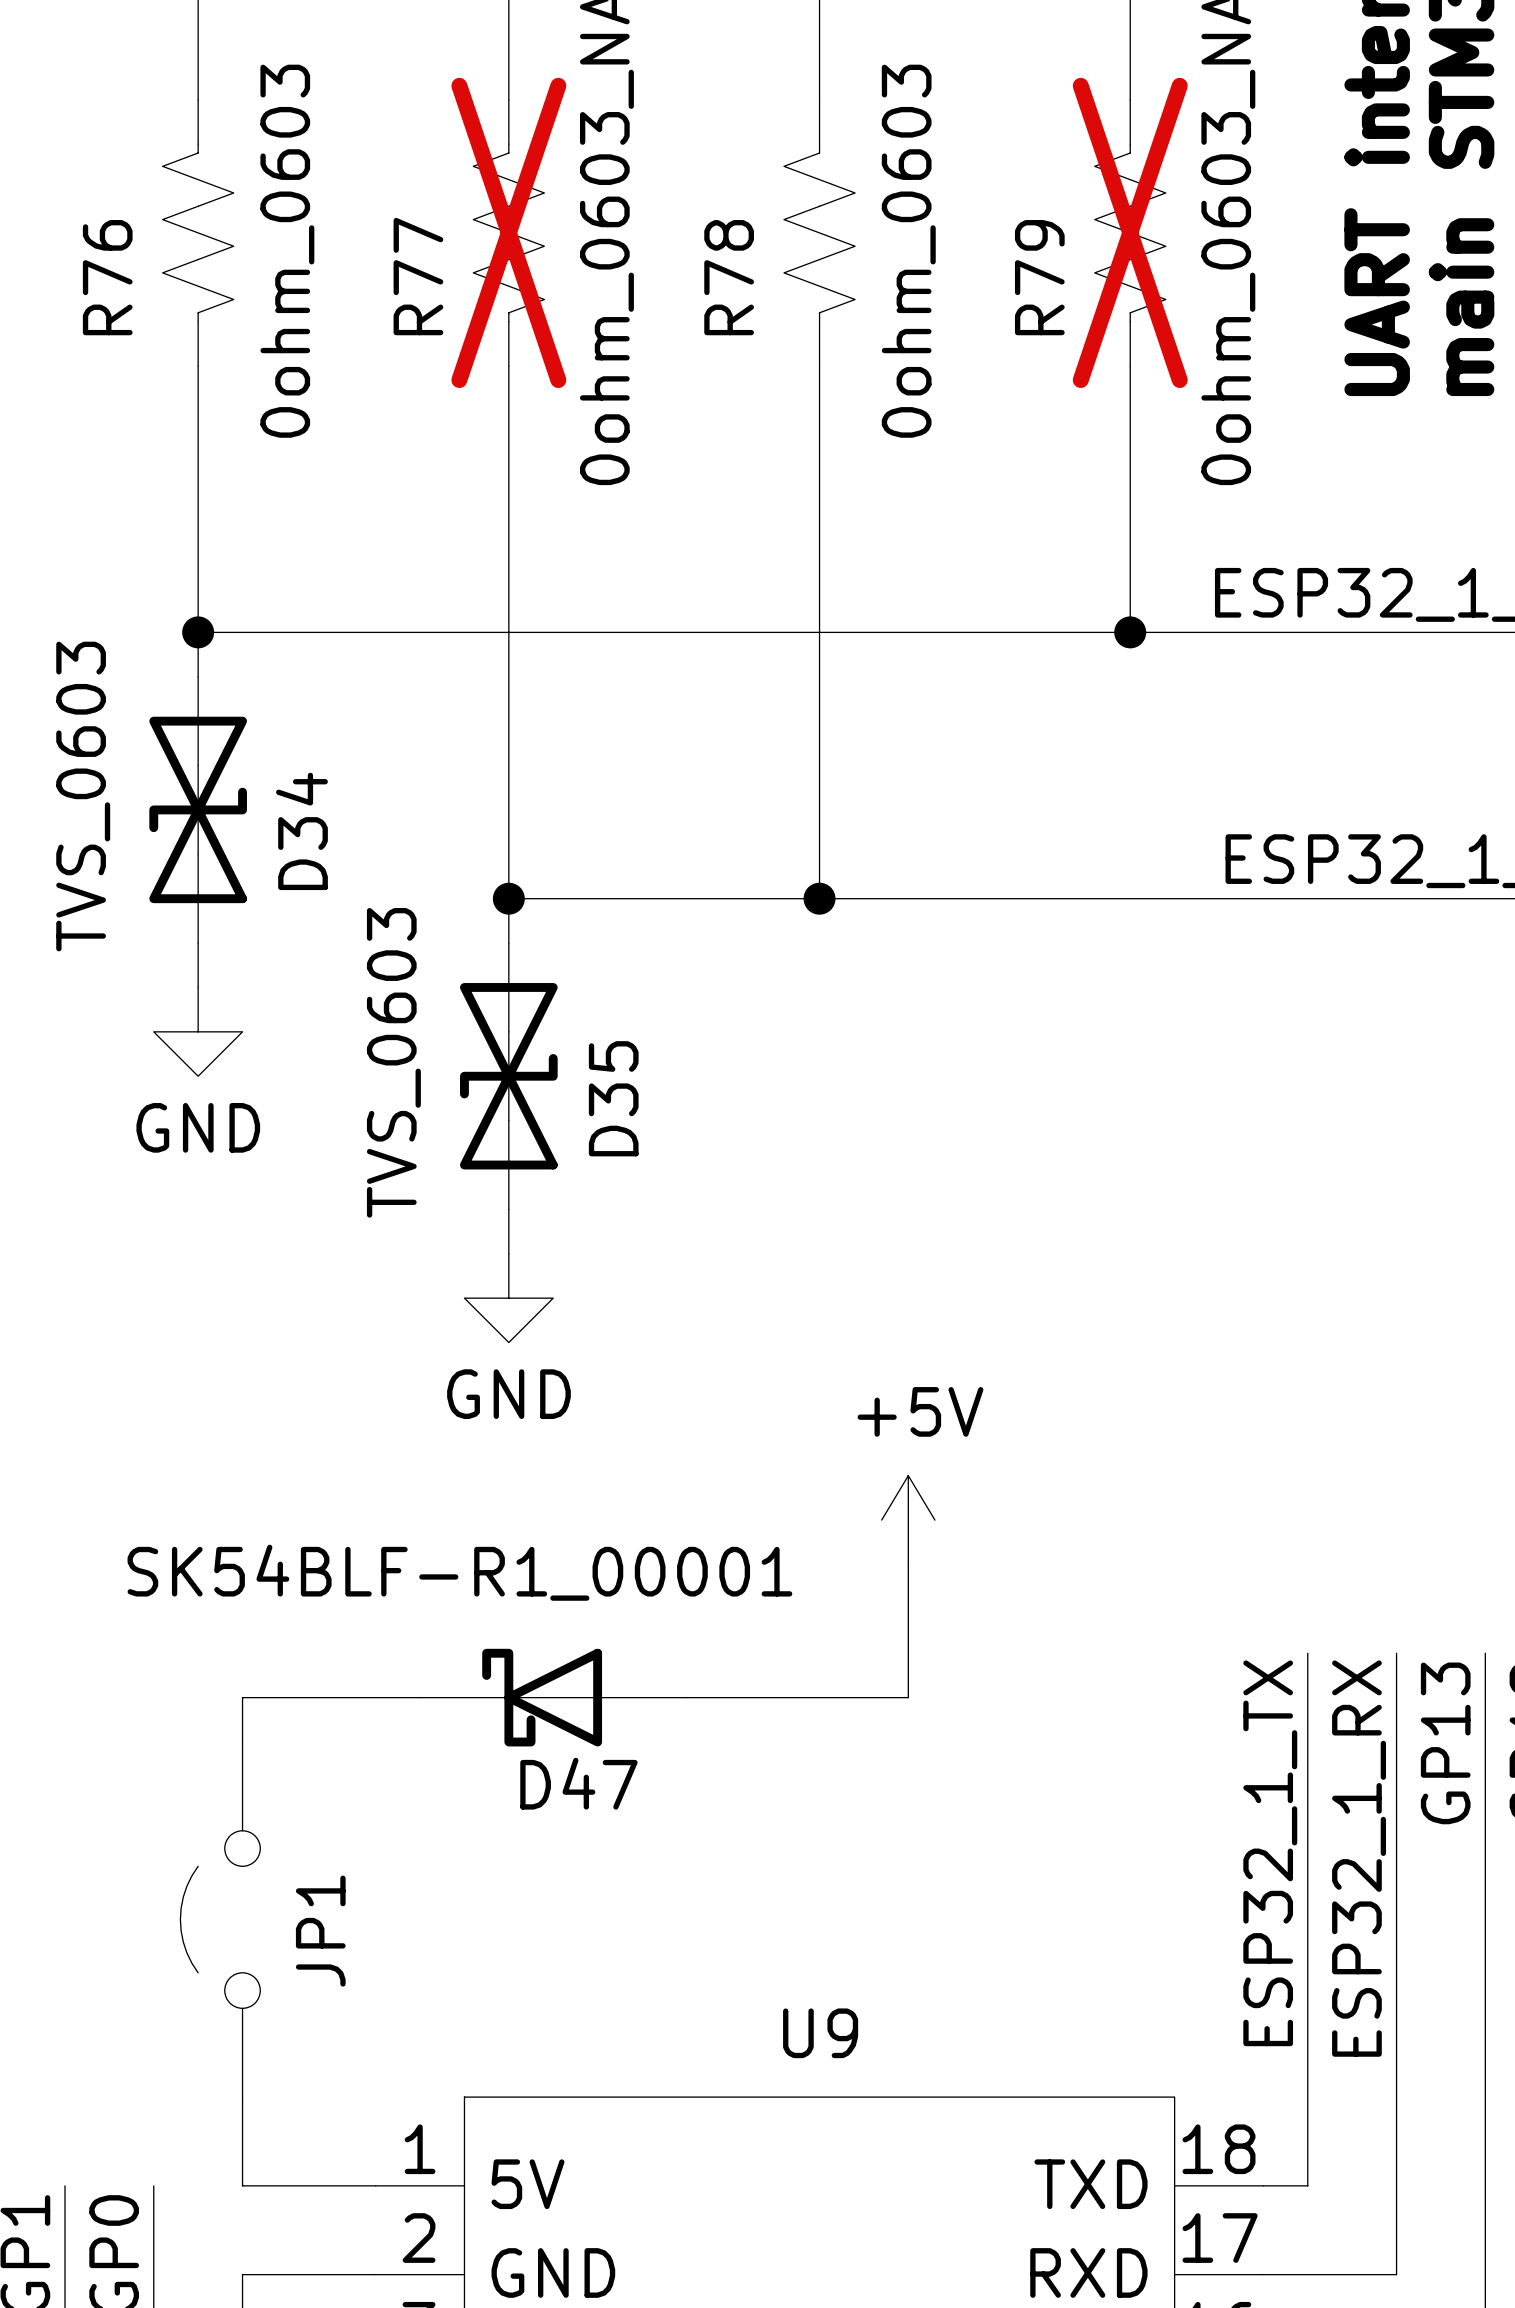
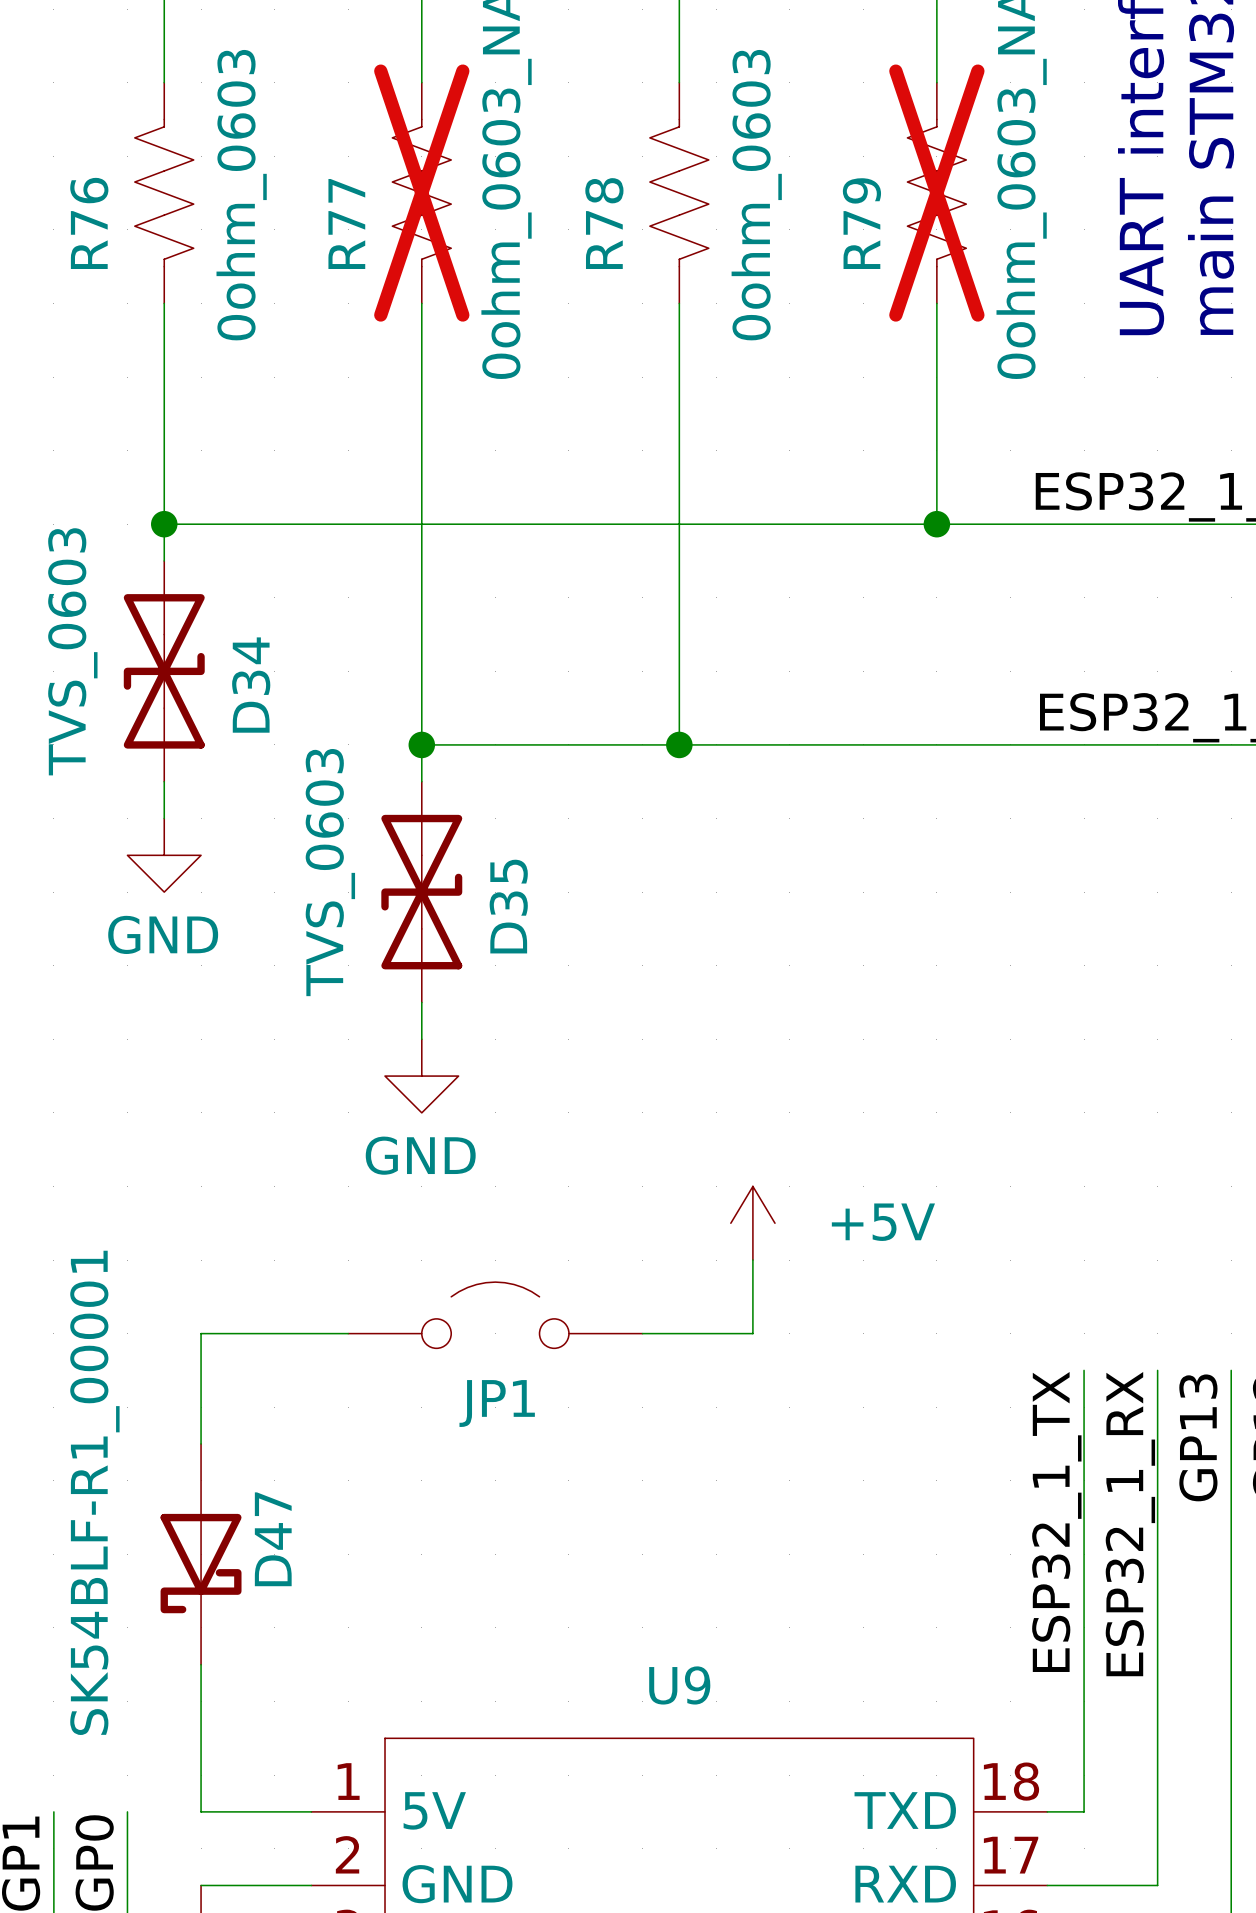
power symbol text position: +5V (920, 1411) -> +5V (883, 1222)
power symbol position: +5V (908, 1520) -> +5V (752, 1223)
wire: (908, 1608) (908, 1697) (686, 1697) -> (752, 1333) (642, 1333)
wire: (242, 1697) (420, 1697) -> (201, 1407) (201, 1333) (348, 1333)
D47 rotation: 0° (542, 1697) -> 90° counterclockwise (201, 1563)
D47 position: (553, 1697) -> (201, 1554)
JP1 rotation: 0° (220, 1919) -> 90° clockwise (495, 1315)
JP1 position: (220, 1919) -> (495, 1315)

